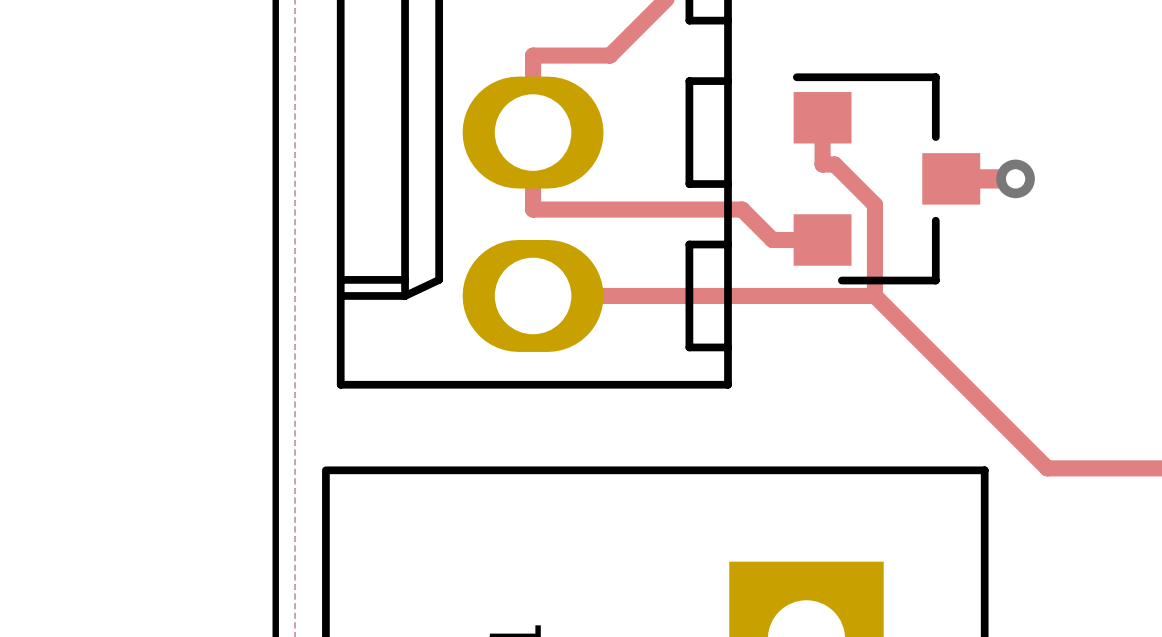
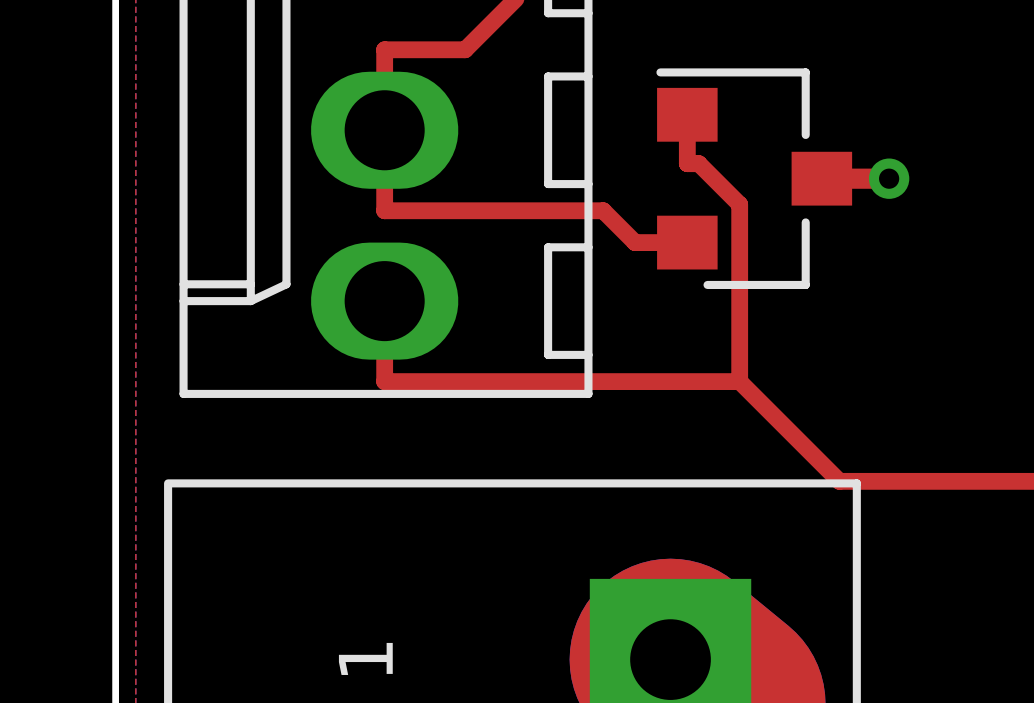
top track: (834, 164) (874, 204) (874, 295) -> (698, 163) (739, 204) (739, 381)
top track: (533, 295) (874, 295) -> (384, 301) (384, 381) (739, 381)
top track: (874, 295) (1047, 468) -> (739, 381) (839, 481) (922, 481)

